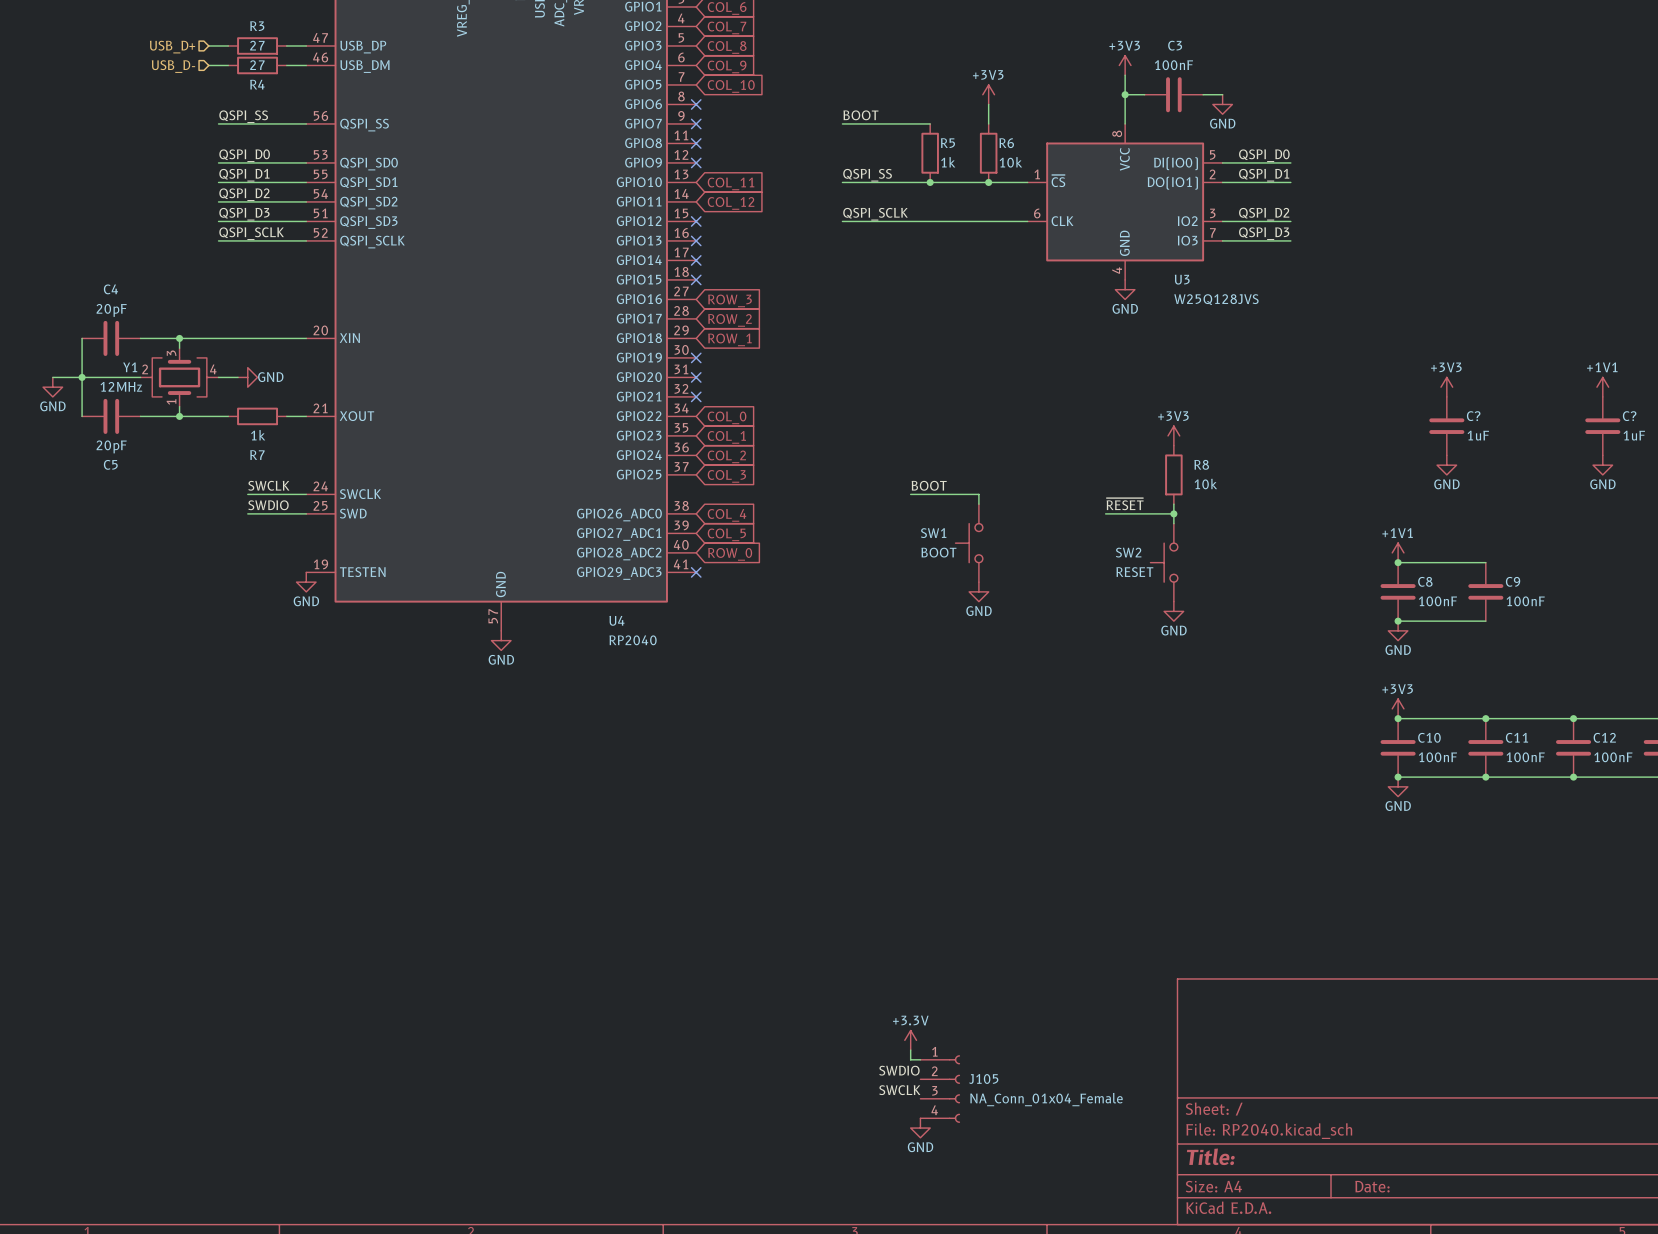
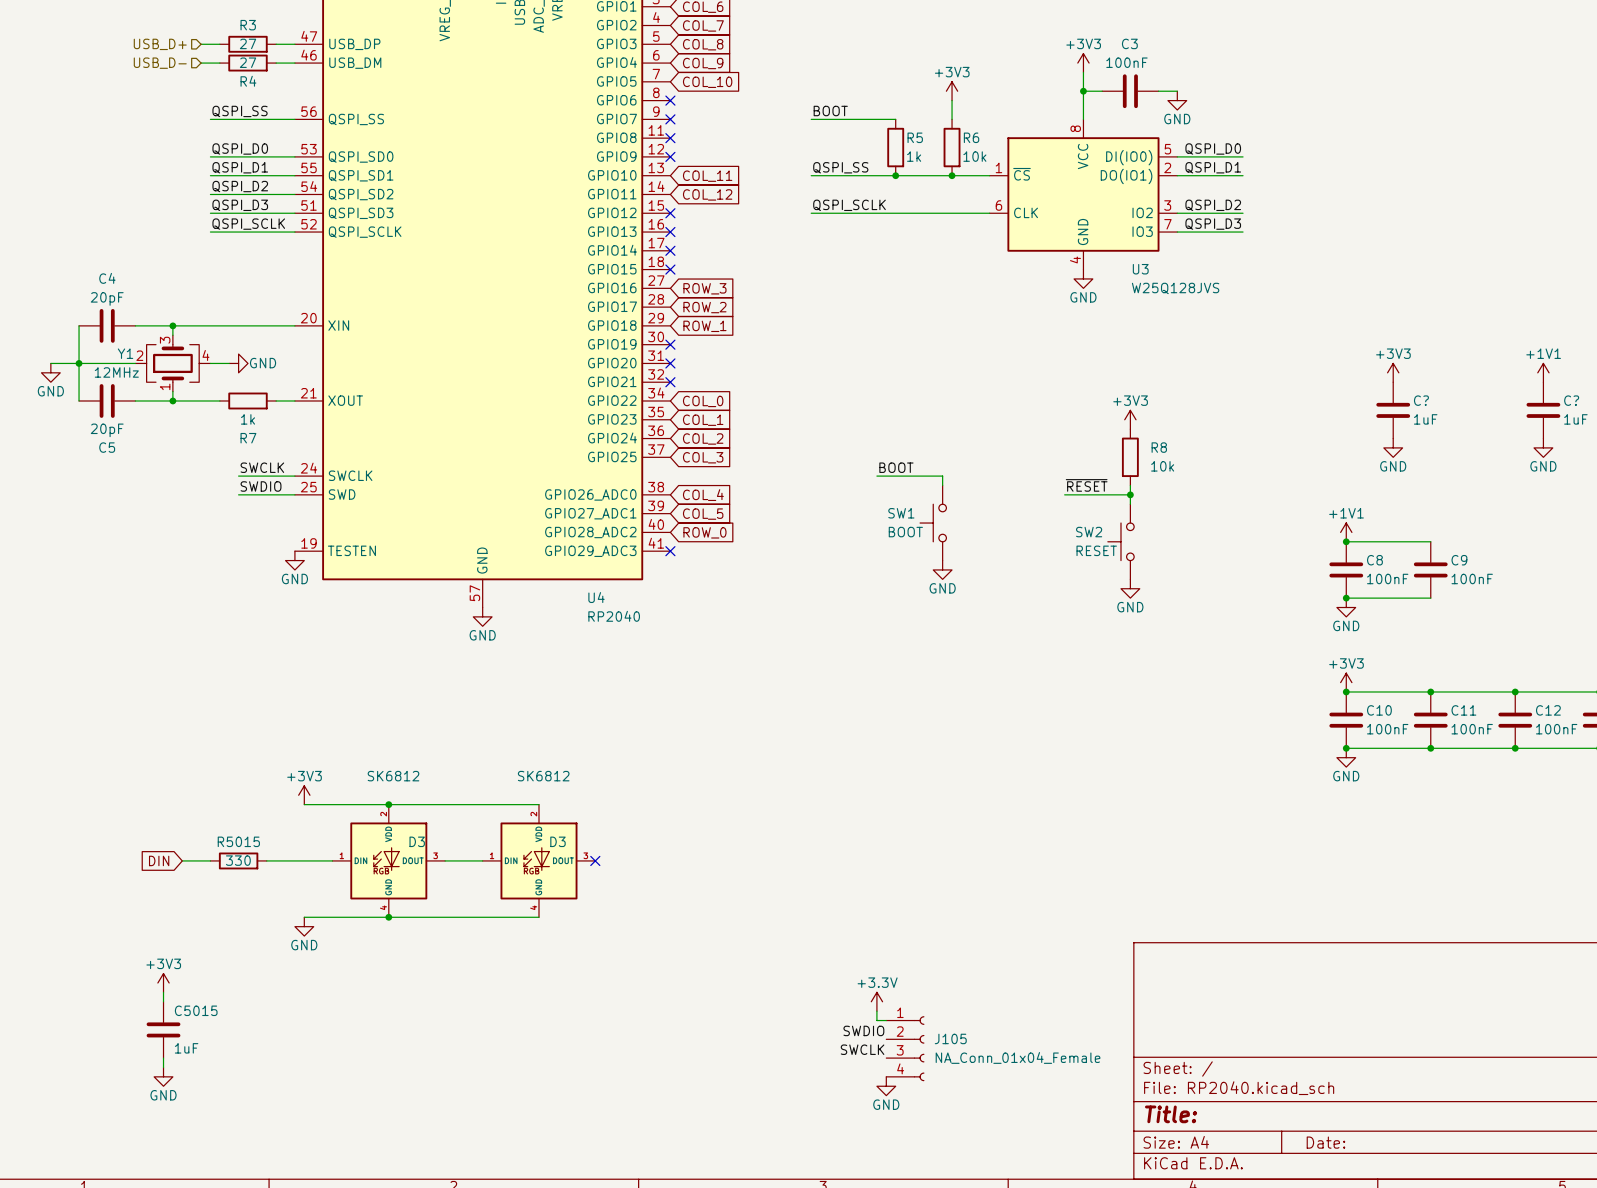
power symbol: none -> +3V3 (304, 795)
wire: none -> (304, 804) (538, 804)
junction: none -> (388, 804)
global label: none -> DIN (159, 860)
wire: none -> (182, 860) (210, 860)
R5015: none -> 330 (238, 860)
wire: none -> (266, 860) (332, 860)
D3: none -> SK6812 (388, 860)
wire: none -> (445, 860) (482, 860)
D3: none -> SK6812 (538, 860)
no-connect mark: none -> (595, 860)
wire: none -> (304, 917) (538, 917)
junction: none -> (388, 917)
power symbol: none -> GND (304, 926)
power symbol: none -> +3V3 (163, 982)
wire: none -> (163, 992) (163, 1001)
C5015: none -> 1uF (163, 1029)
wire: none -> (163, 1058) (163, 1067)
power symbol: none -> GND (163, 1076)

